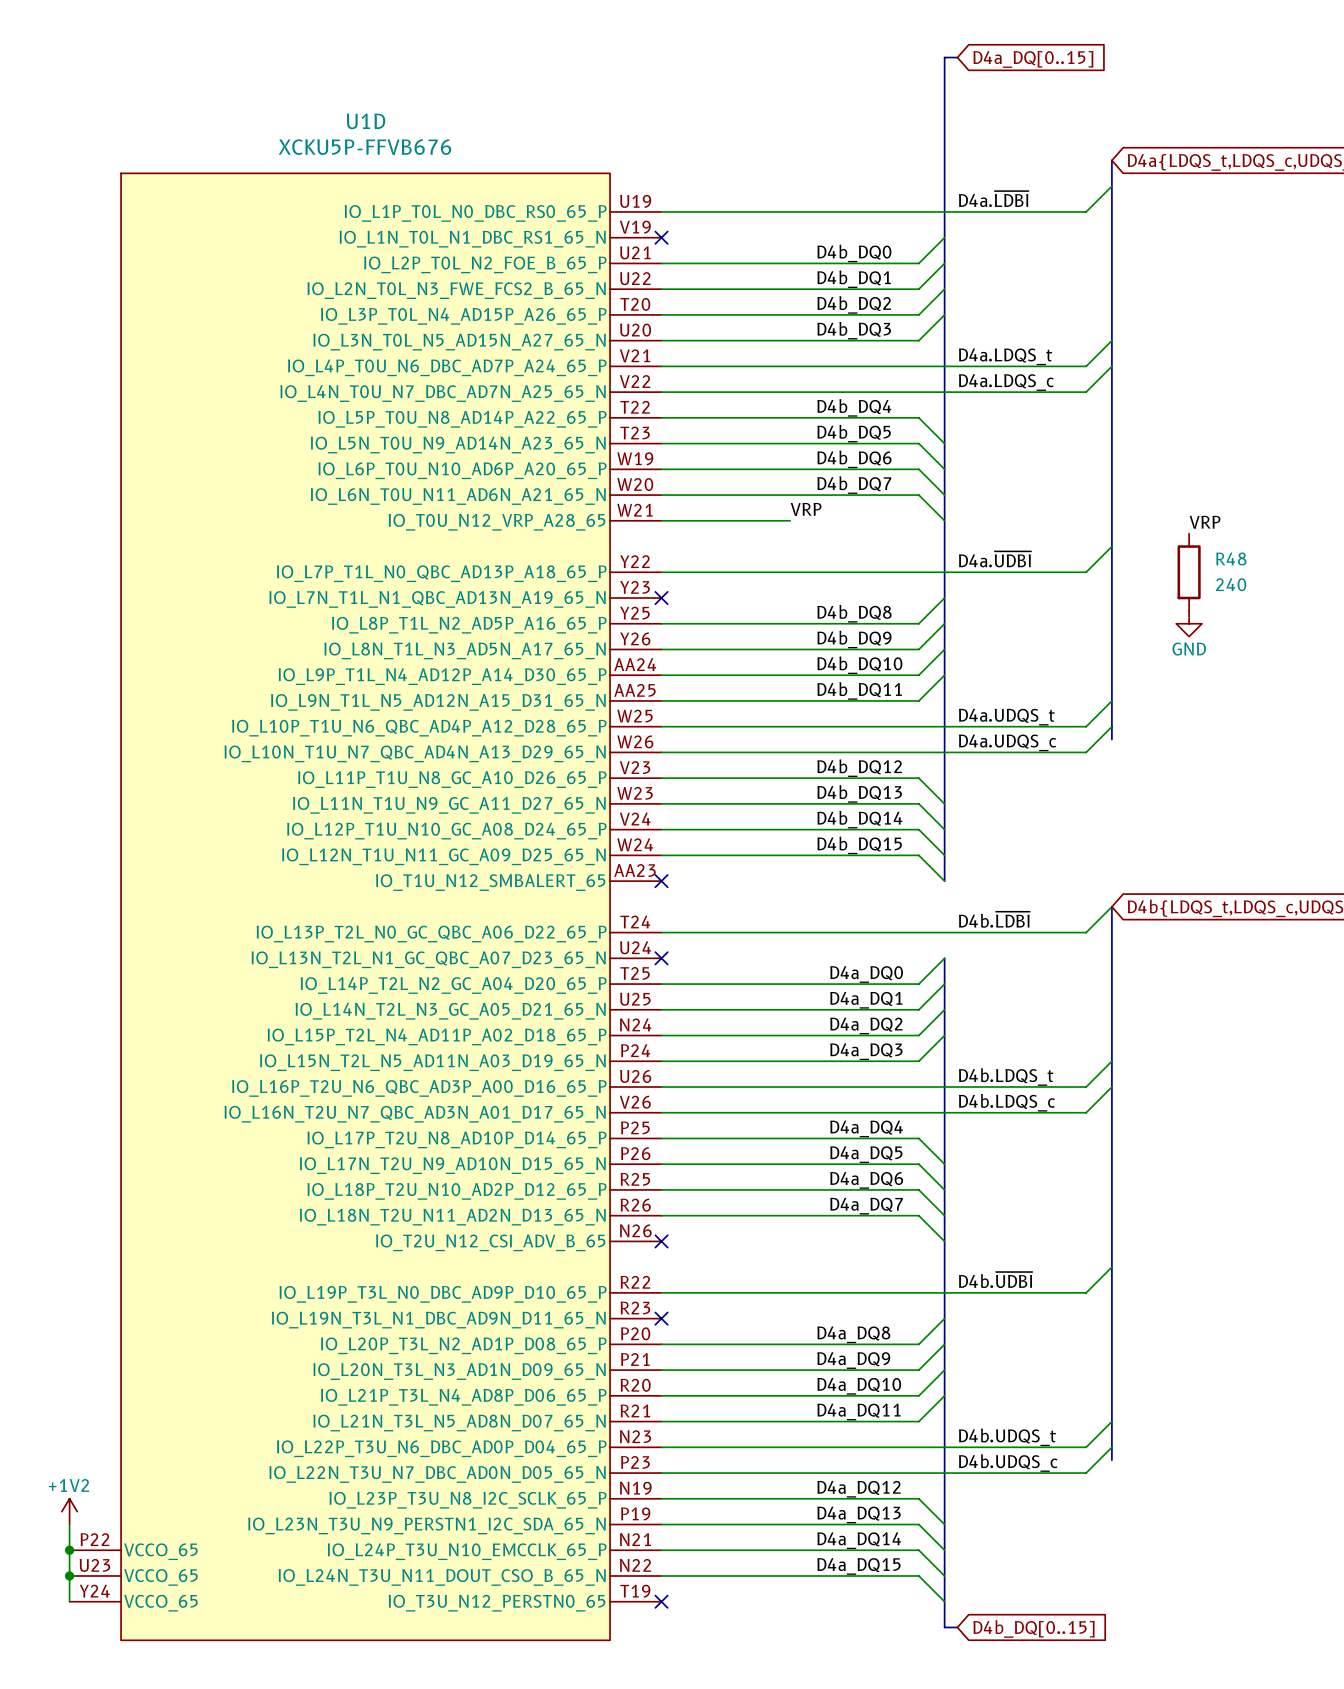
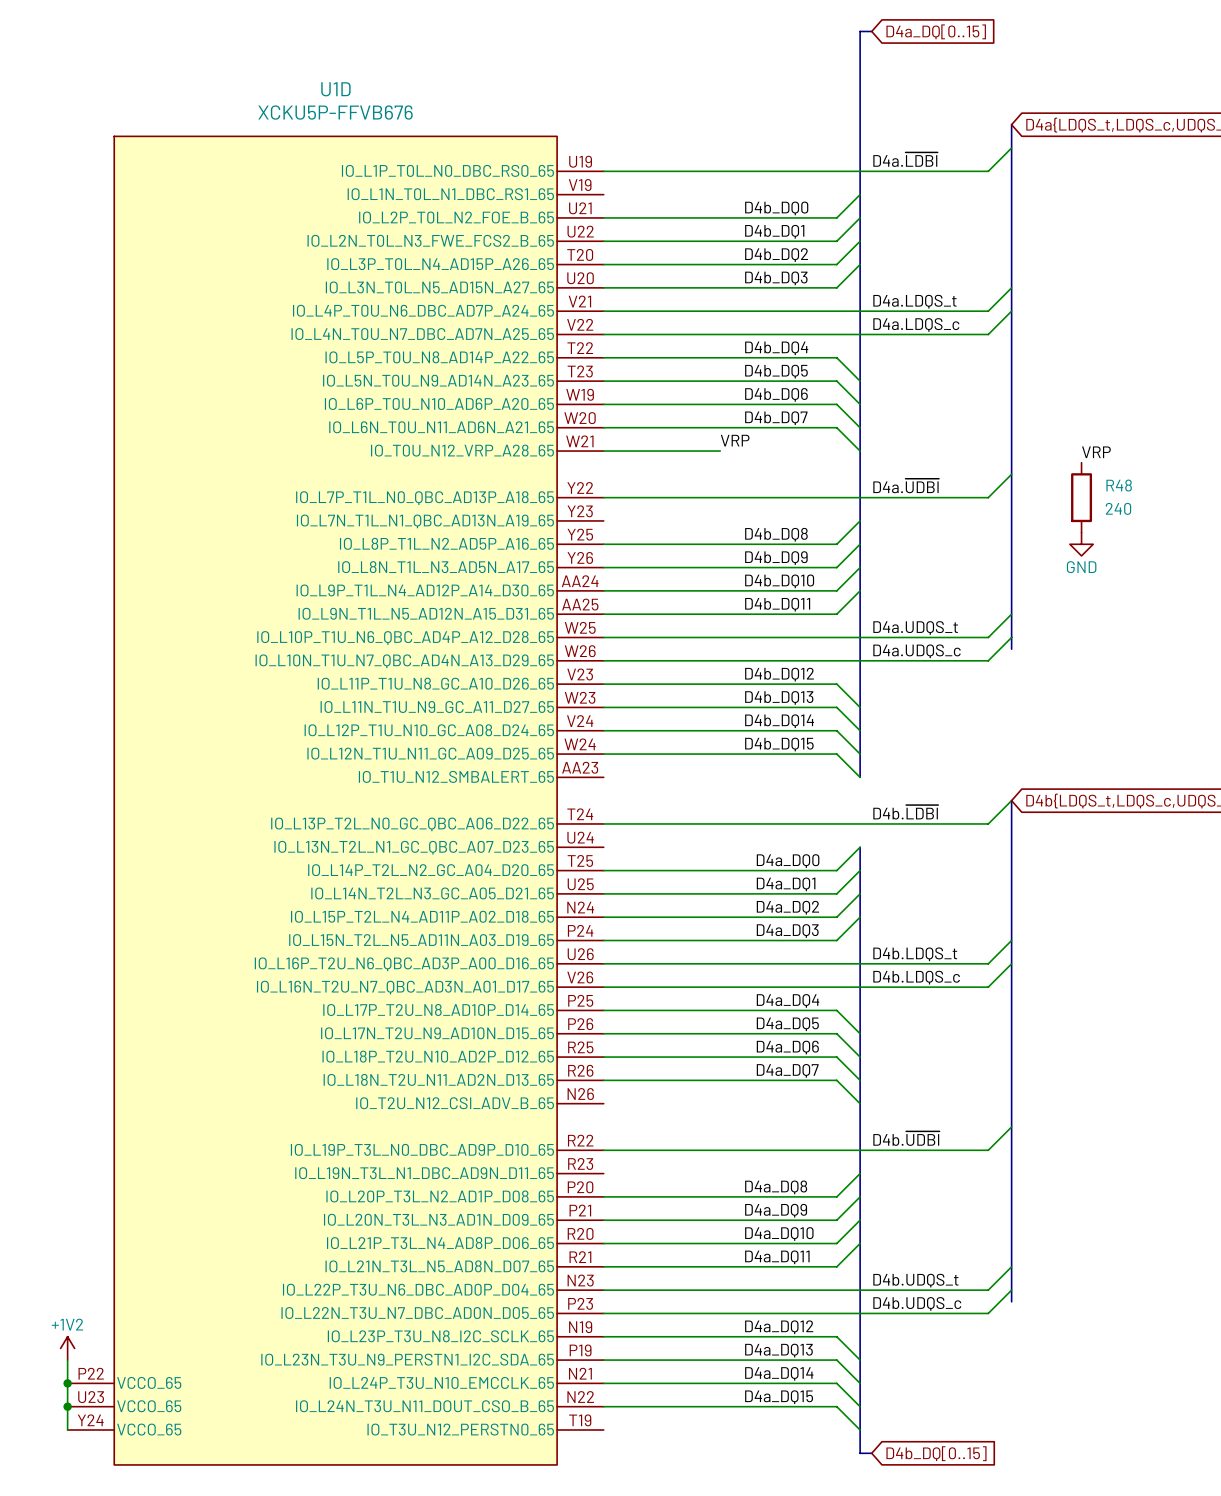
U1D symbol: [69, 173, 662, 1641] -> [67, 136, 604, 1465]
no-connect mark: (661, 237) -> none
no-connect mark: (661, 598) -> none
no-connect mark: (661, 881) -> none
no-connect mark: (661, 958) -> none
no-connect mark: (661, 1241) -> none
no-connect mark: (661, 1318) -> none
no-connect mark: (661, 1601) -> none

